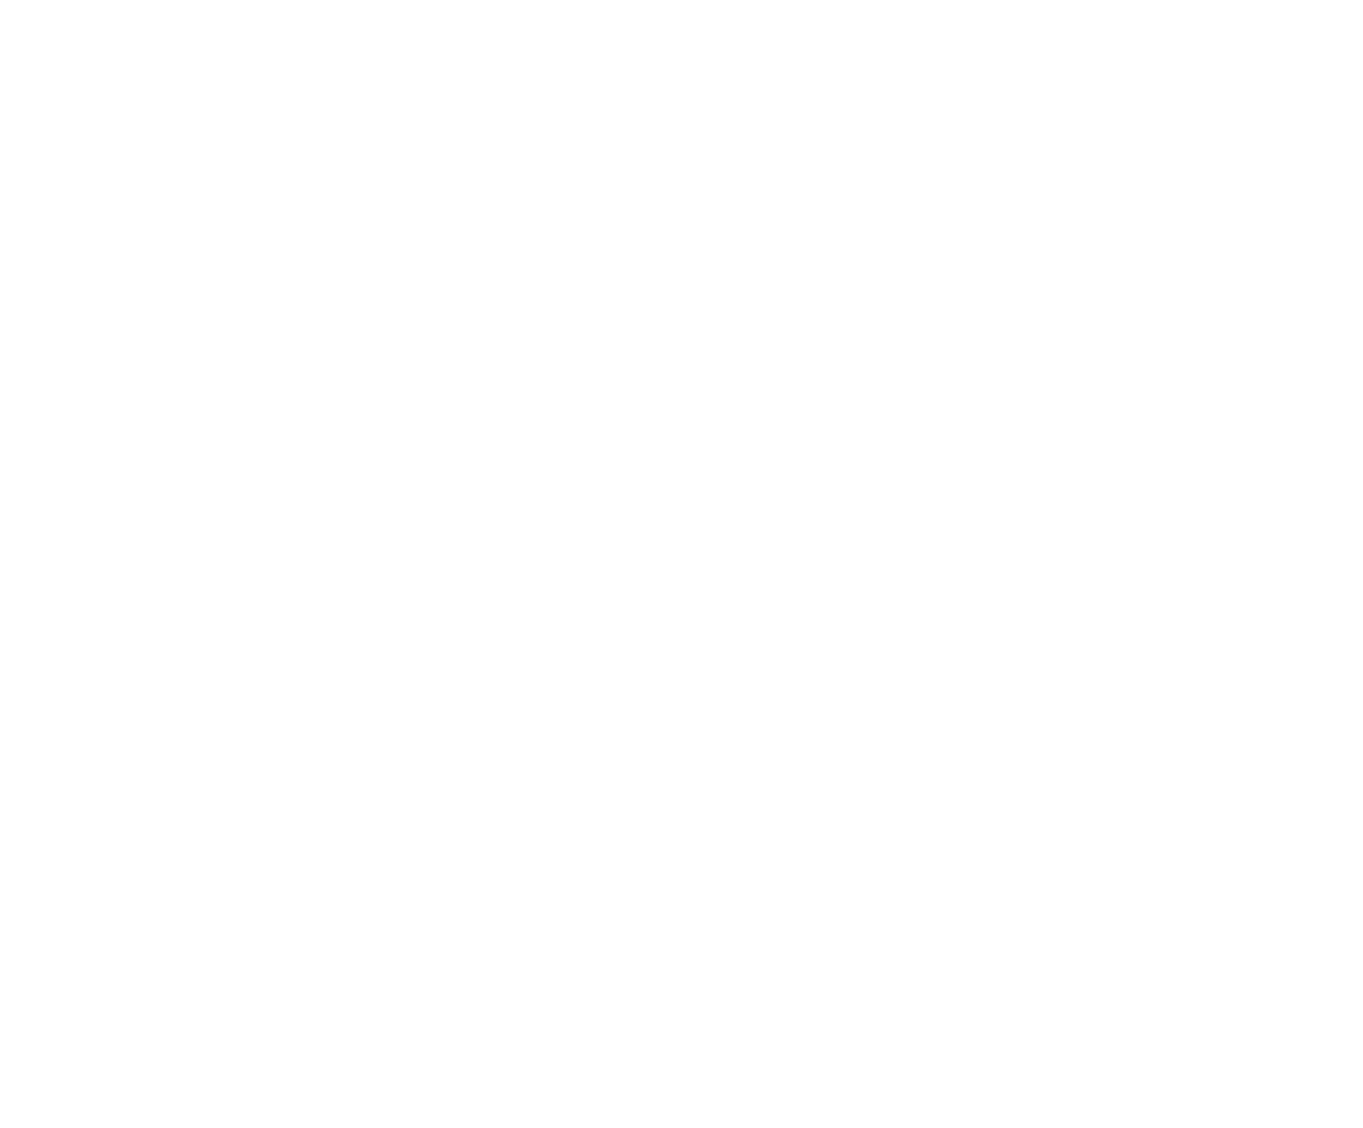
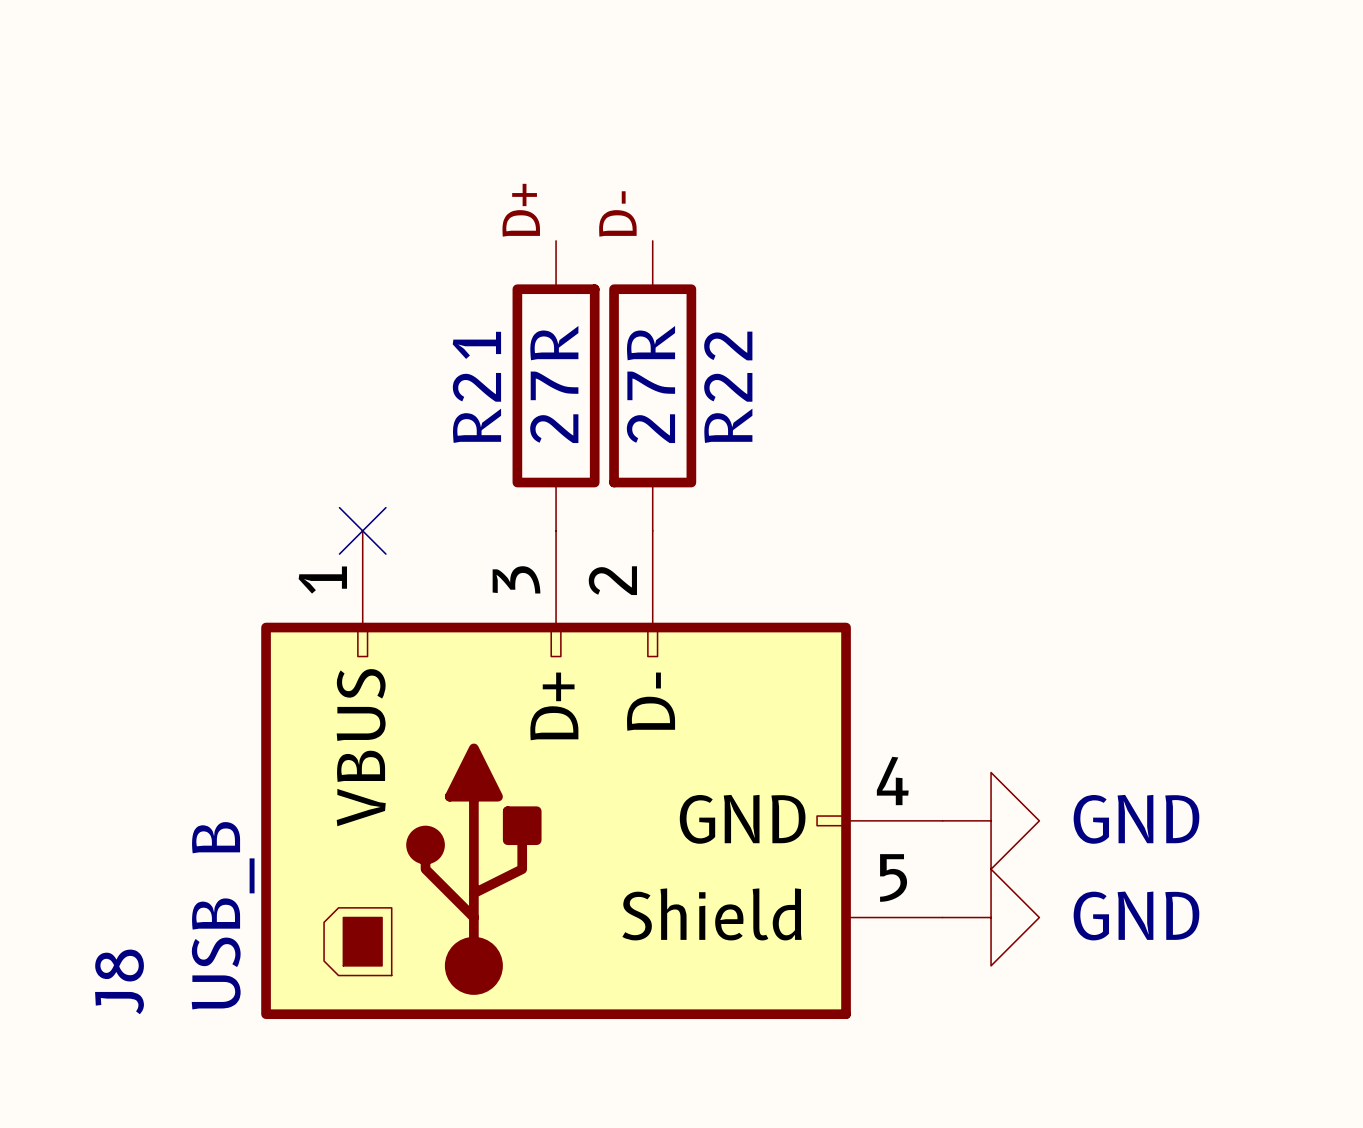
label: none -> D+ (521, 210)
label: none -> D- (617, 213)
R21: none -> 27R (556, 385)
R22: none -> 27R (652, 385)
no-connect mark: none -> (362, 530)
J8: none -> USB_B (601, 774)
power symbol: none -> GND (991, 820)
power symbol: none -> GND (991, 917)

